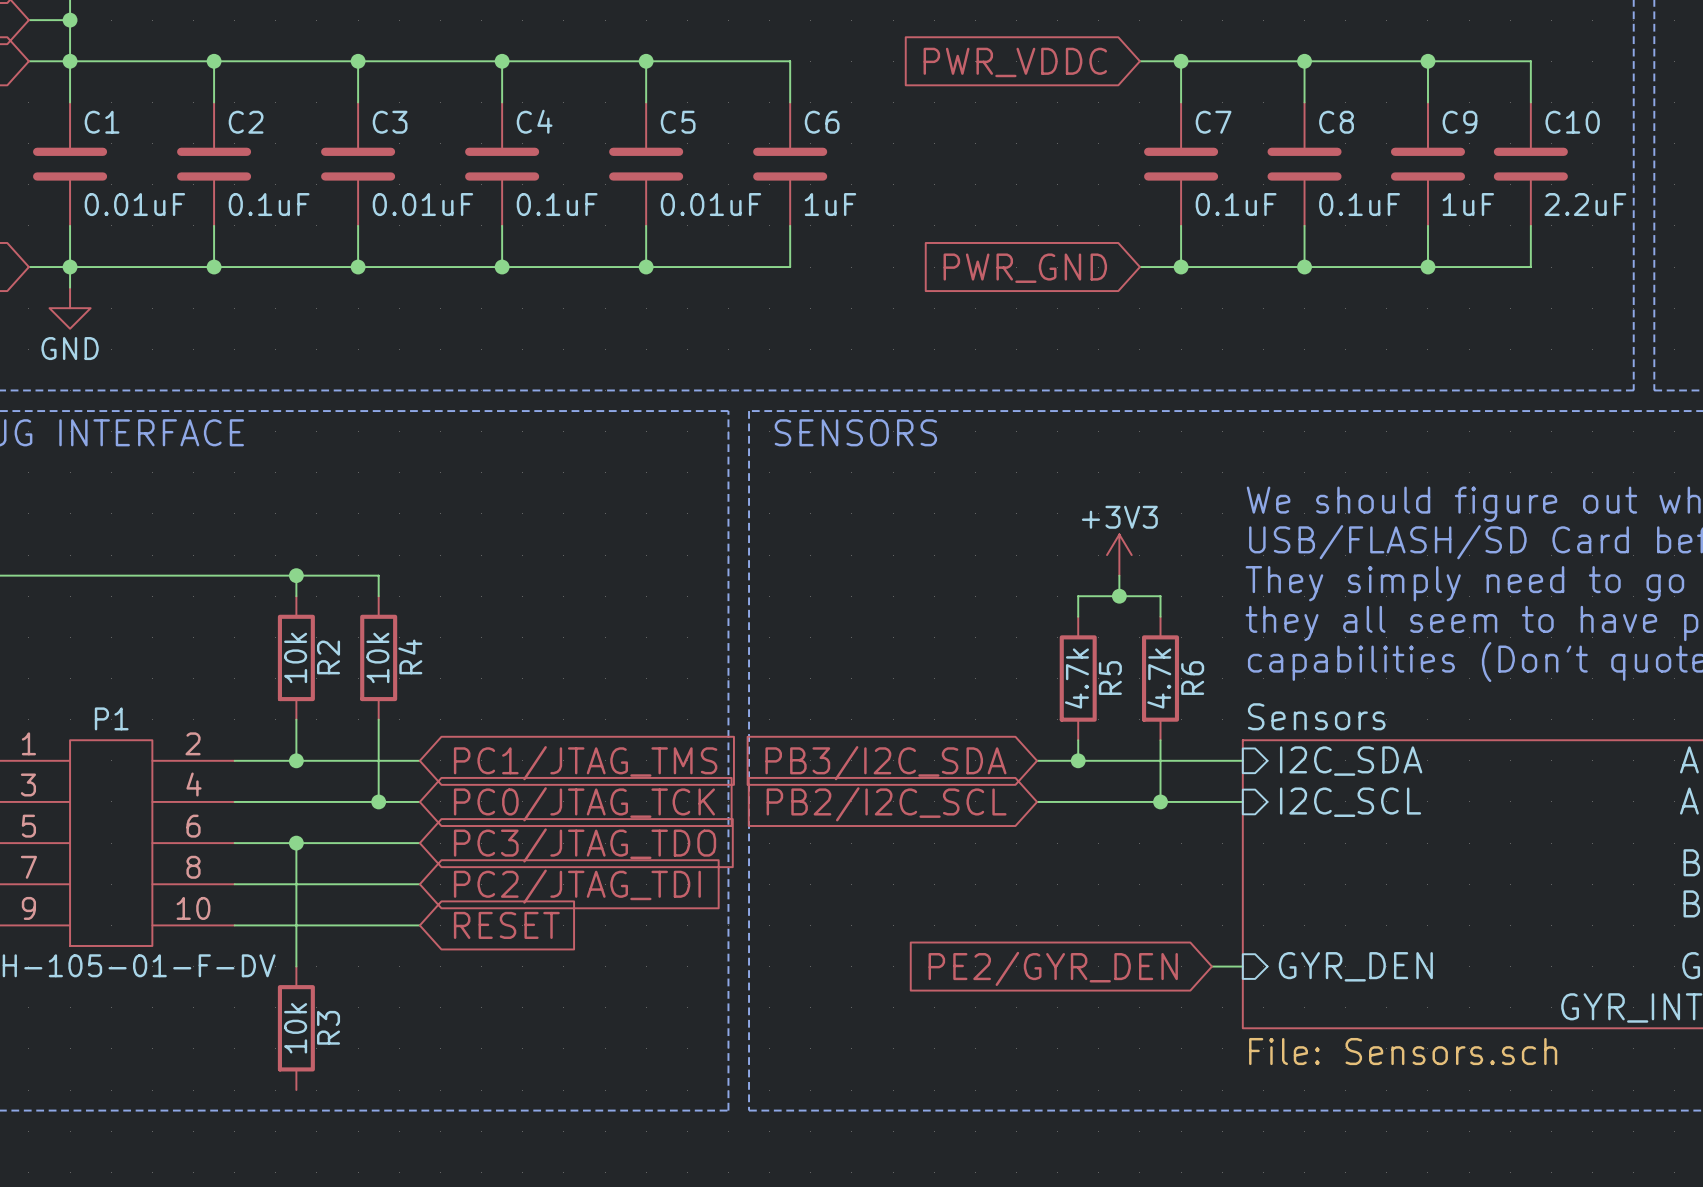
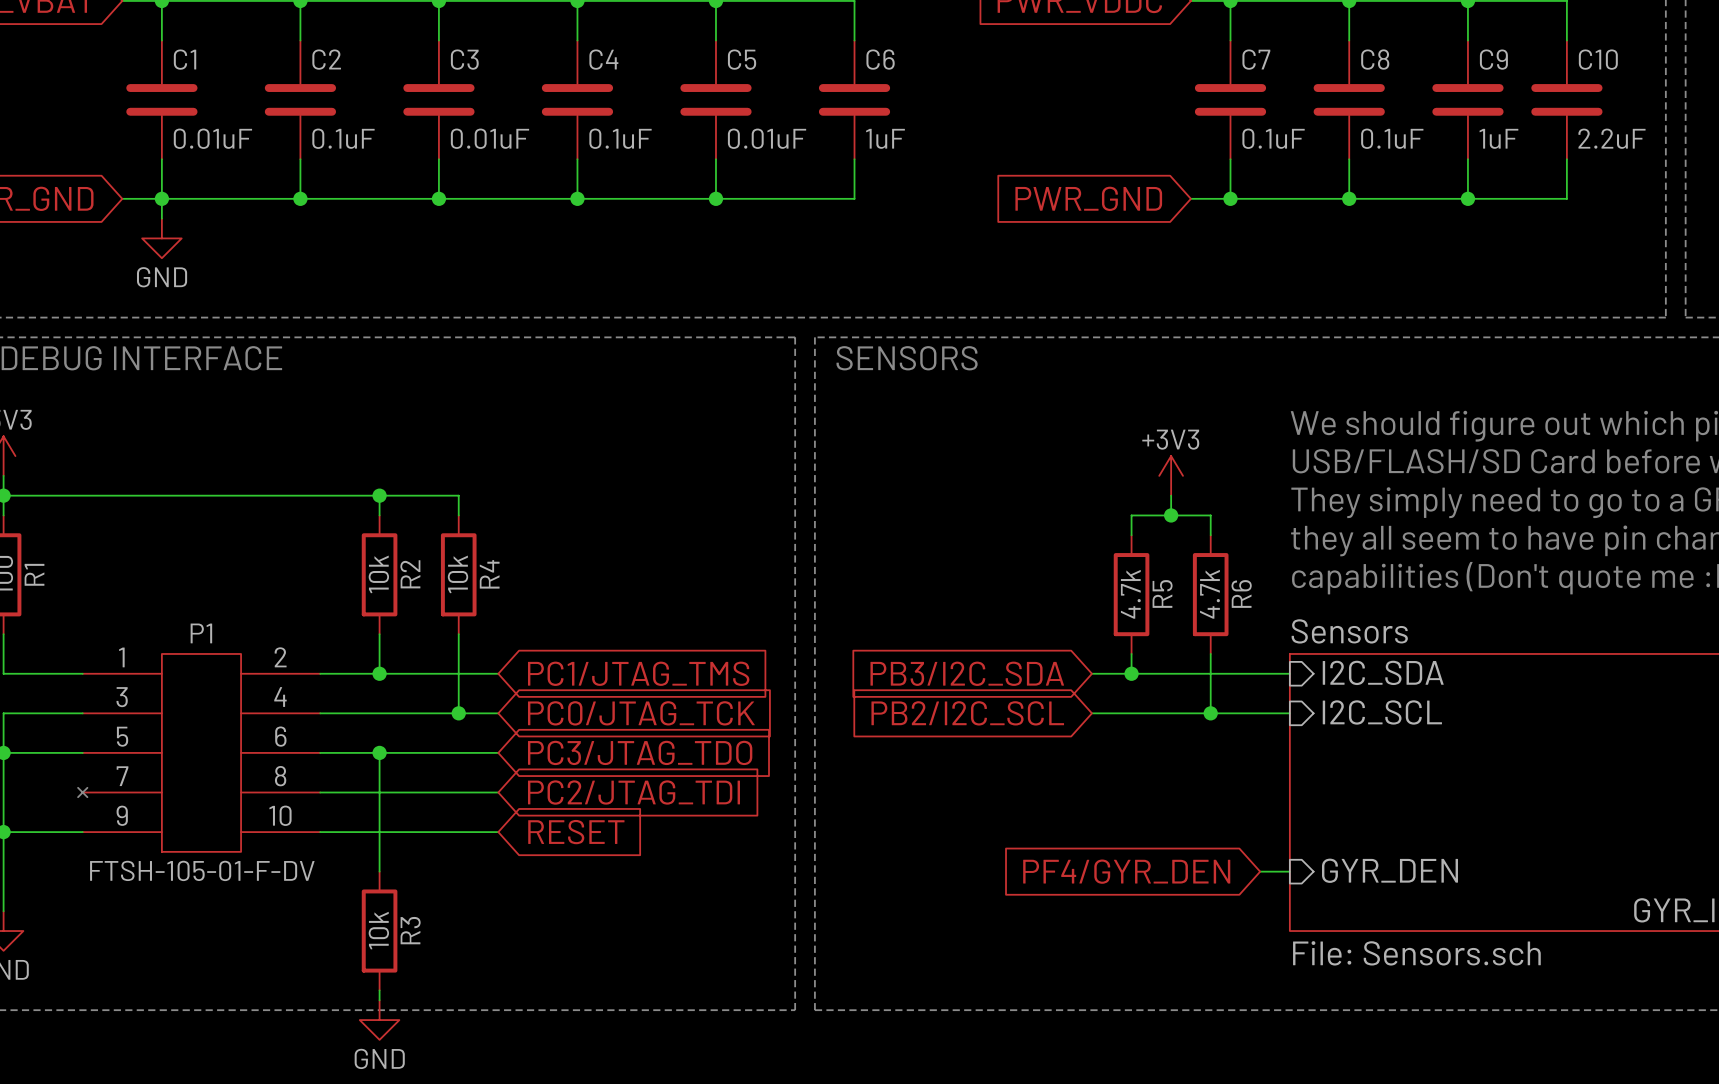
global label: PE2/GYR_DEN (1053, 968) -> PF4/GYR_DEN (1126, 871)
wire: none -> (379, 990) (379, 1000)
power symbol: none -> GND (379, 1020)

